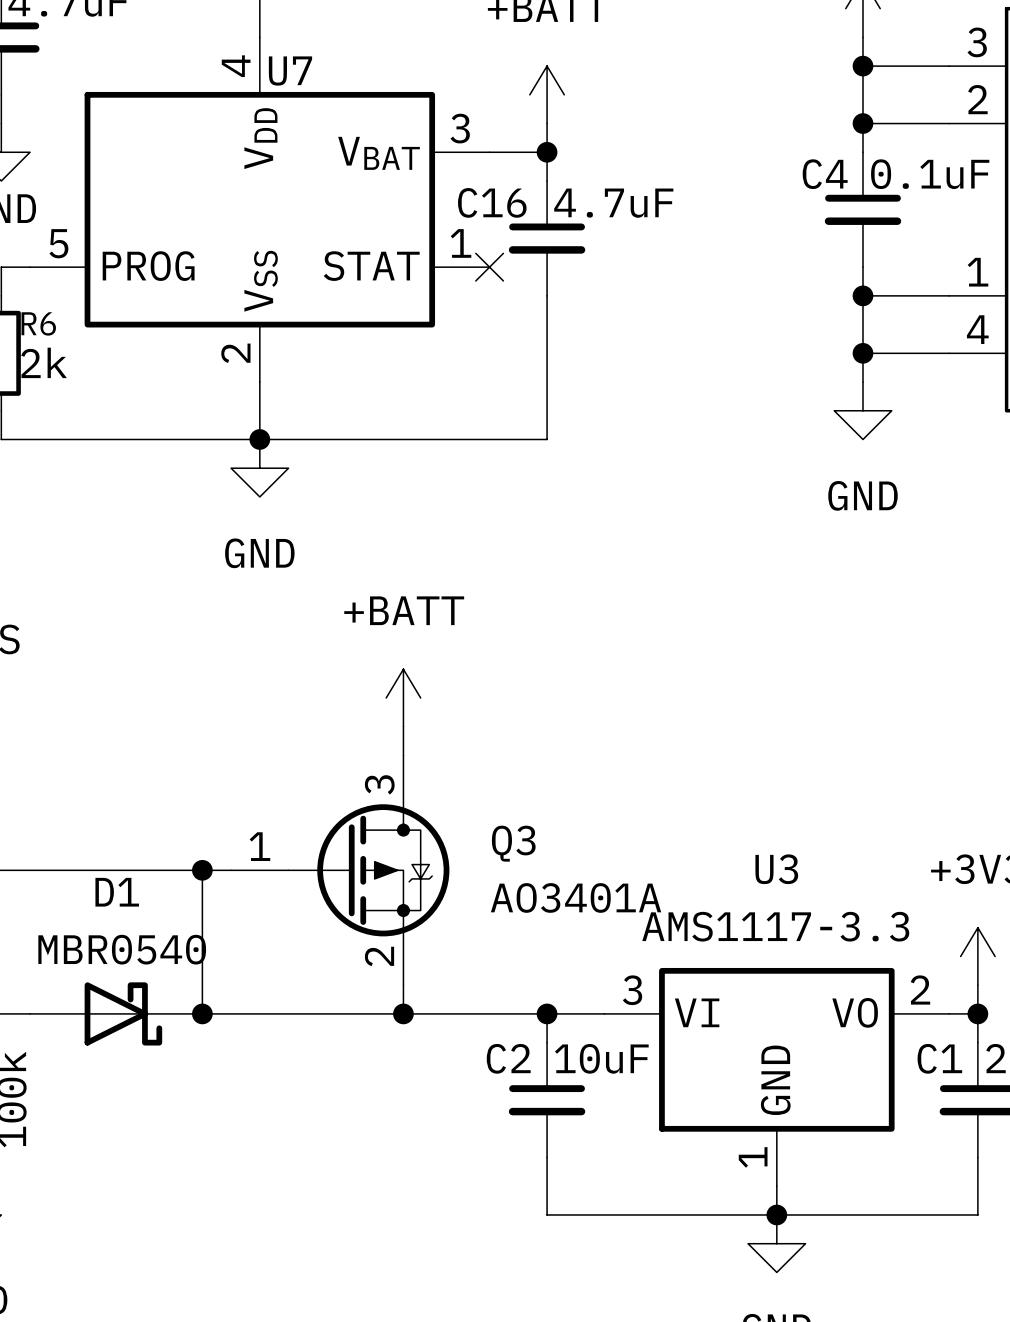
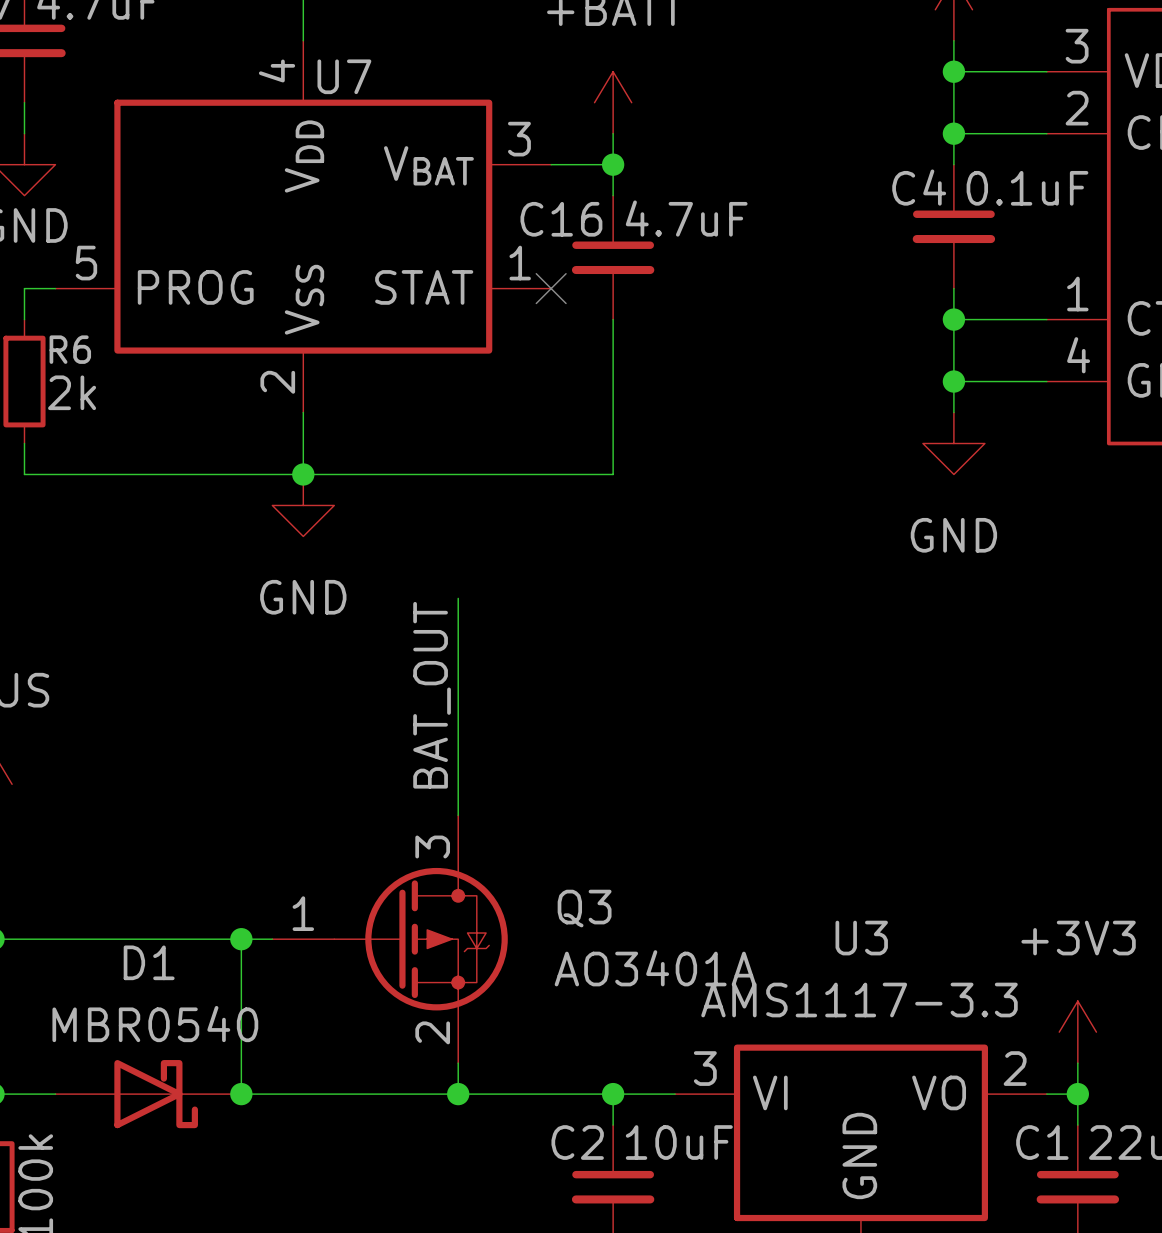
wire: none -> (458, 598) (458, 784)
label: none -> BAT_OUT (432, 695)
power symbol: +BATT (403, 697) -> none

